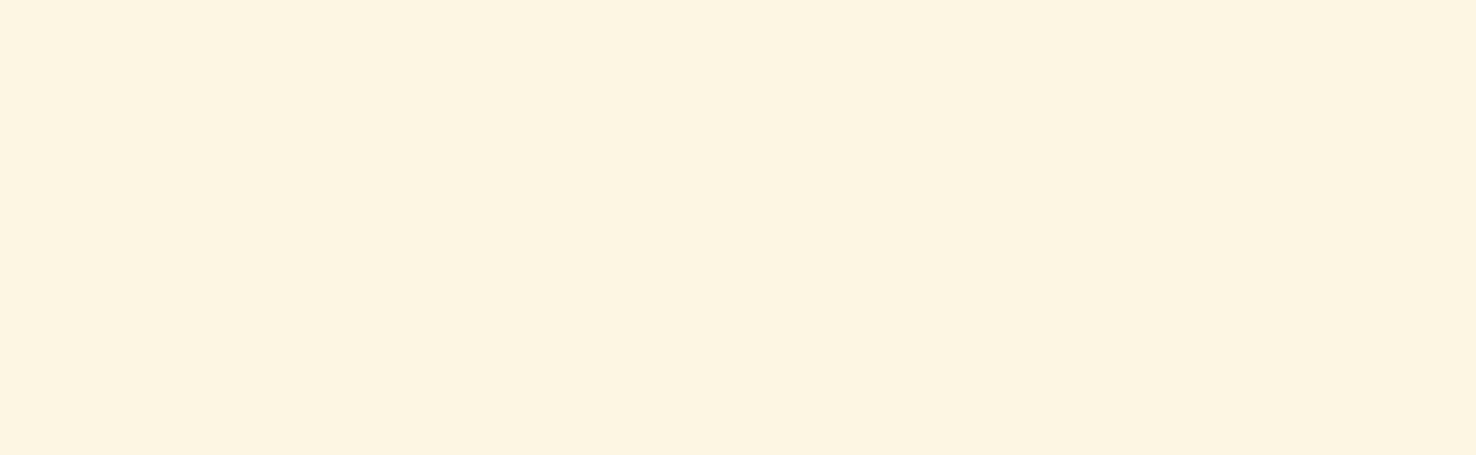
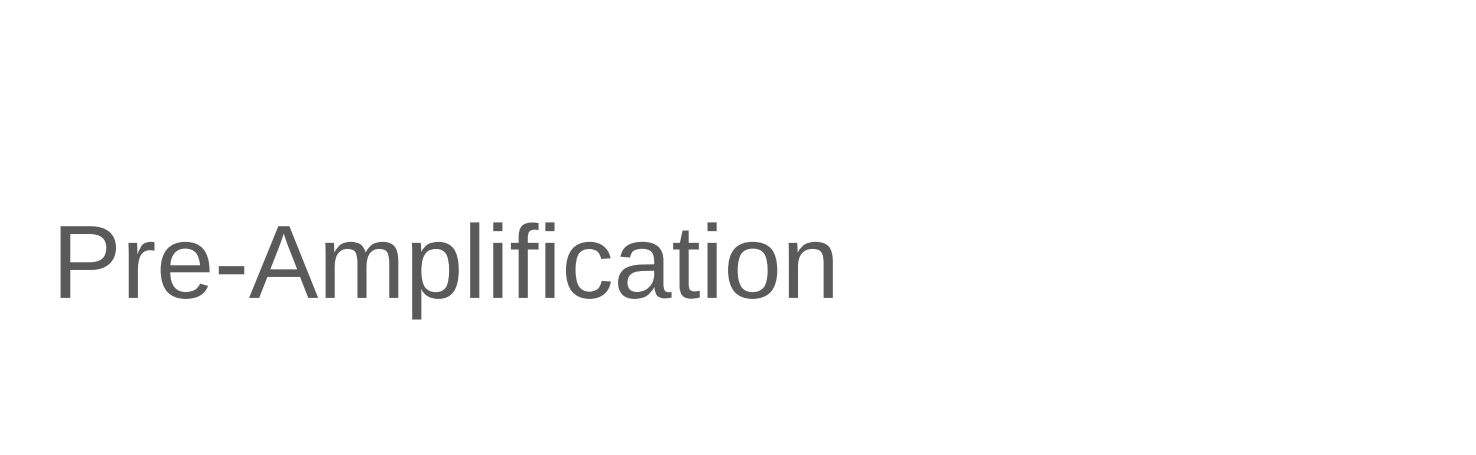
text: none -> Pre-Amplification (446, 270)

